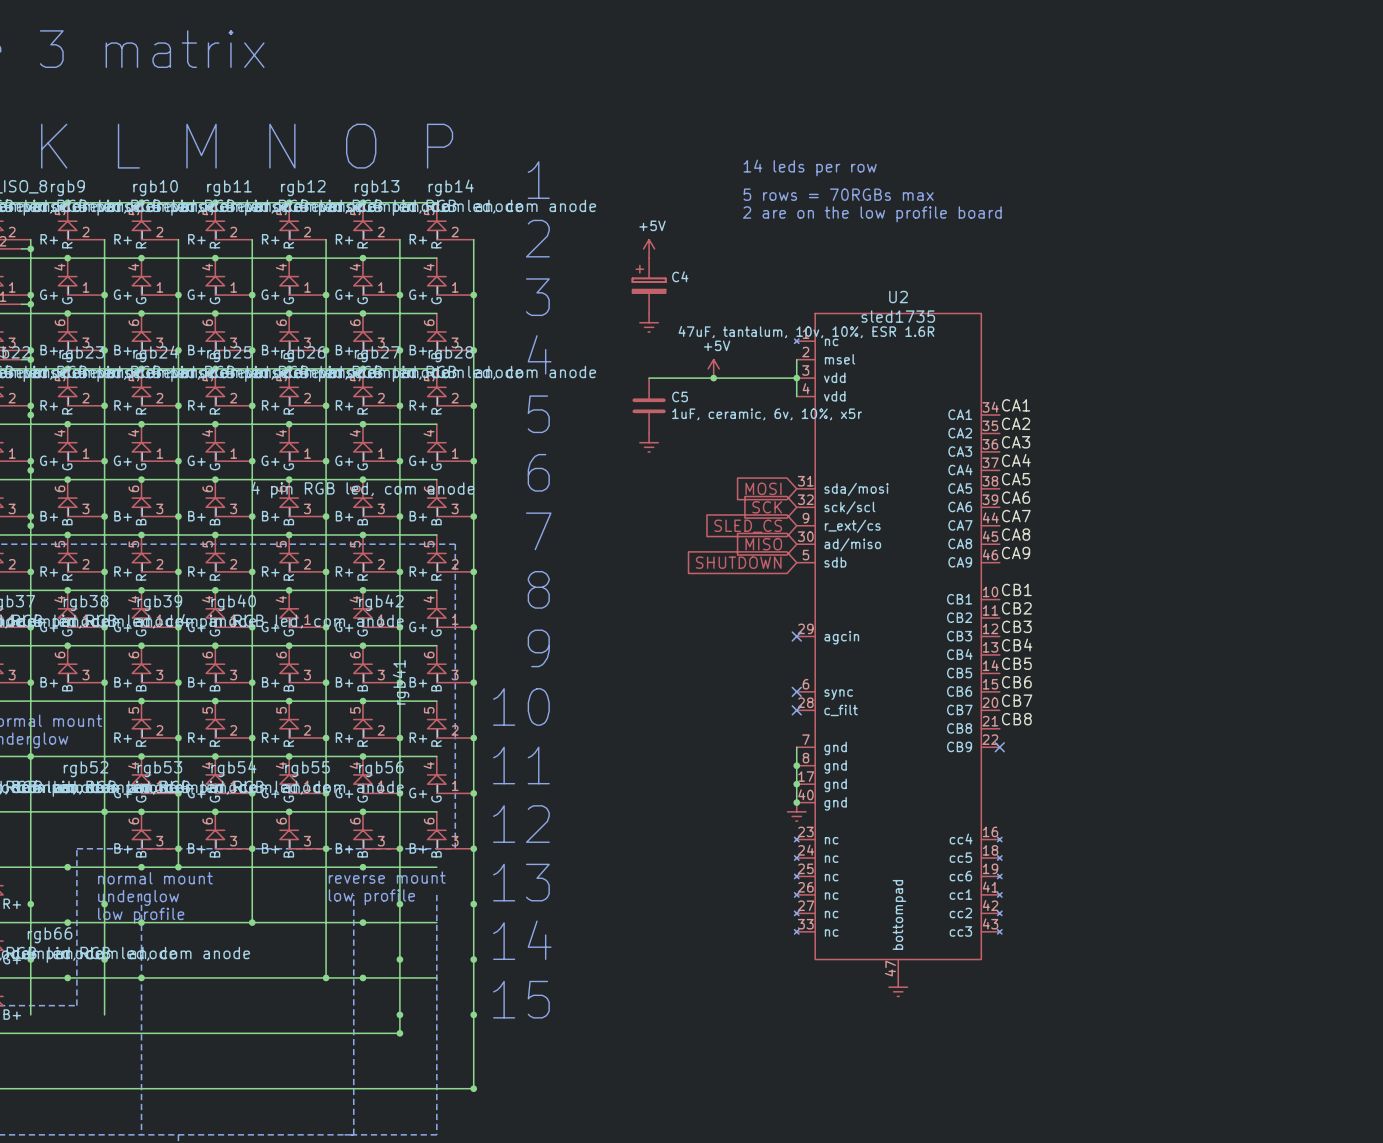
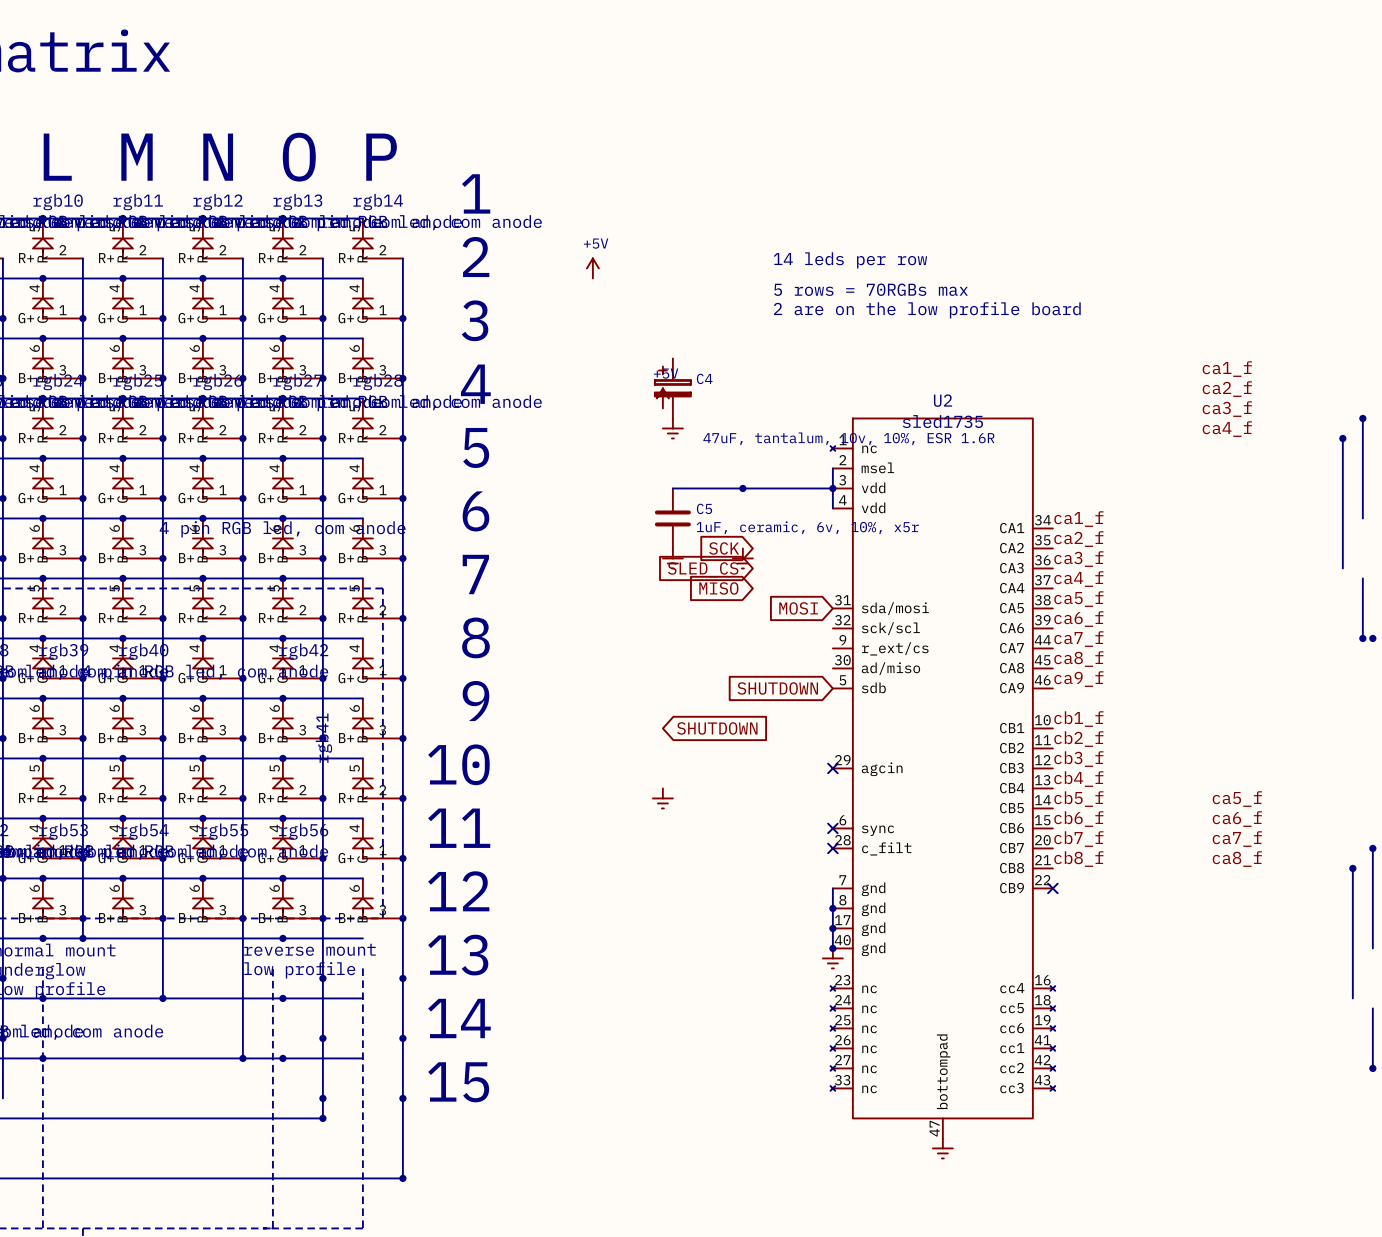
text position: 14 leds per row (810, 167) -> 14 leds per row (850, 260)
text position: 5 rows = 70RGBs max (838, 194) -> 5 rows = 70RGBs max (870, 289)
text position: 2 are on the low profile board (872, 214) -> 2 are on the low profile board (927, 310)
C4 position: (649, 285) -> (672, 388)
power symbol: (649, 322) -> none
label: none -> ca1_f (1227, 369)
wire: (796, 359) (796, 396) -> (832, 468) (832, 508)
label: none -> ca2_f (1227, 389)
wire: (649, 378) (796, 378) -> (672, 488) (832, 488)
junction: (713, 378) -> none
junction: (796, 378) -> none
label: none -> ca3_f (1227, 409)
wire: none -> (1362, 418) (1362, 518)
junction: none -> (1362, 418)
power symbol: none -> (672, 428)
label: none -> ca4_f (1227, 429)
C5 position: (649, 405) -> (672, 518)
label: CA1 (1016, 405) -> none
wire: none -> (1342, 438) (1342, 568)
junction: none -> (1342, 438)
label: CA2 (1016, 423) -> none
power symbol: (649, 442) -> none
label: CA3 (1016, 442) -> none
junction: none -> (742, 488)
junction: none -> (832, 488)
label: CA4 (1016, 460) -> none
label: CA5 (1016, 479) -> none
label: none -> ca1_f (1078, 519)
global label position: MOSI (763, 488) -> MOSI (798, 608)
label: CA6 (1016, 497) -> none
label: none -> ca2_f (1078, 539)
power symbol: none -> (672, 558)
power symbol: none -> (742, 558)
label: CA7 (1016, 516) -> none
label: none -> ca3_f (1078, 559)
label: CA8 (1016, 534) -> none
label: none -> ca4_f (1078, 579)
wire: none -> (1362, 578) (1362, 638)
label: CA9 (1016, 553) -> none
label: none -> ca5_f (1078, 599)
global label: SHUTDOWN (738, 562) -> none
label: none -> ca6_f (1078, 619)
label: CB1 (1016, 589) -> none
label: none -> ca7_f (1078, 639)
junction: none -> (1362, 638)
junction: none -> (1372, 638)
label: CB2 (1016, 608) -> none
label: none -> ca8_f (1078, 659)
label: CB3 (1016, 626) -> none
label: none -> ca9_f (1078, 679)
no-connect mark: (796, 636) -> none
global label: none -> SHUTDOWN (777, 688)
U2 position: (898, 645) -> (942, 778)
label: CB4 (1017, 645) -> none
label: CB5 (1016, 663) -> none
label: none -> cb1_f (1078, 719)
global label: none -> SHUTDOWN (717, 728)
label: CB6 (1016, 682) -> none
label: none -> cb2_f (1078, 739)
no-connect mark: (796, 691) -> none
label: CB7 (1017, 700) -> none
label: none -> cb3_f (1078, 759)
no-connect mark: (796, 710) -> none
no-connect mark: none -> (832, 768)
label: CB8 (1016, 719) -> none
label: none -> cb4_f (1078, 779)
power symbol: none -> (662, 798)
label: none -> cb5_f (1078, 799)
label: none -> ca5_f (1237, 799)
wire: (796, 747) (796, 802) -> (832, 888) (832, 948)
no-connect mark: (999, 747) -> none
label: none -> cb6_f (1078, 819)
label: none -> ca6_f (1237, 819)
junction: (796, 765) -> none
no-connect mark: none -> (832, 828)
label: none -> cb7_f (1078, 839)
label: none -> ca7_f (1237, 839)
junction: (796, 784) -> none
no-connect mark: none -> (832, 848)
wire: none -> (1372, 848) (1372, 948)
junction: none -> (1372, 848)
label: none -> cb8_f (1078, 859)
label: none -> ca8_f (1237, 859)
junction: (796, 802) -> none
wire: none -> (1352, 868) (1352, 998)
junction: none -> (1352, 868)
power symbol: (796, 811) -> none
no-connect mark: none -> (1052, 888)
junction: none -> (832, 908)
junction: none -> (832, 928)
junction: none -> (832, 948)
power symbol: none -> (832, 958)
wire: none -> (1372, 1008) (1372, 1068)
power symbol: (898, 987) -> none
junction: none -> (1372, 1068)
power symbol: none -> (942, 1148)

